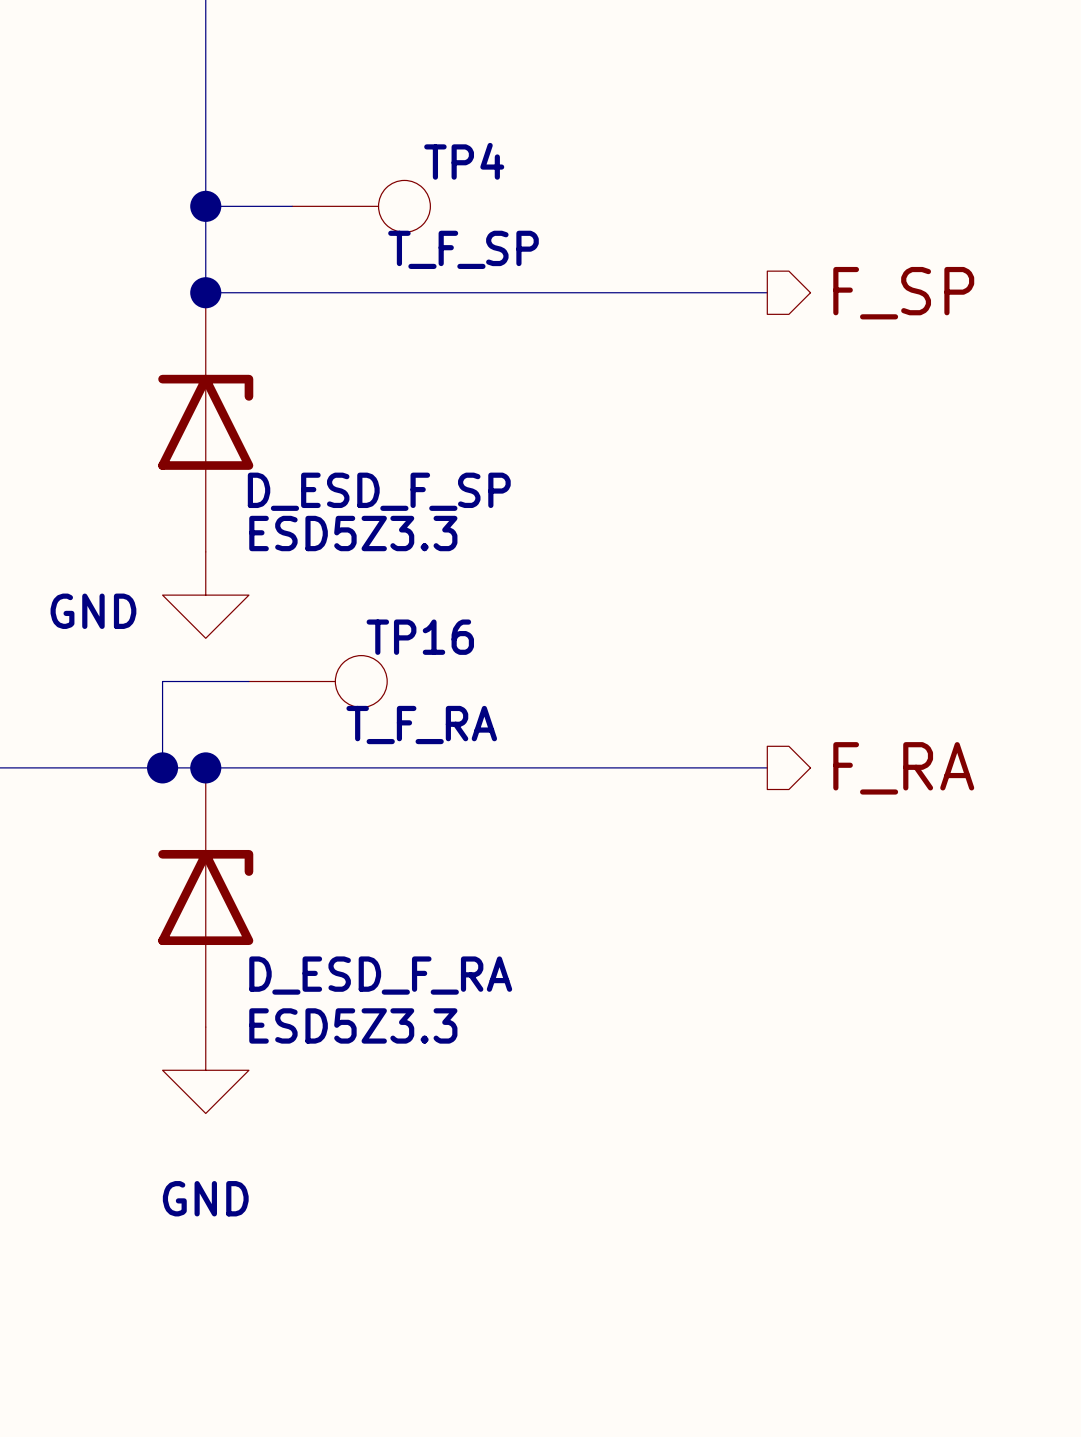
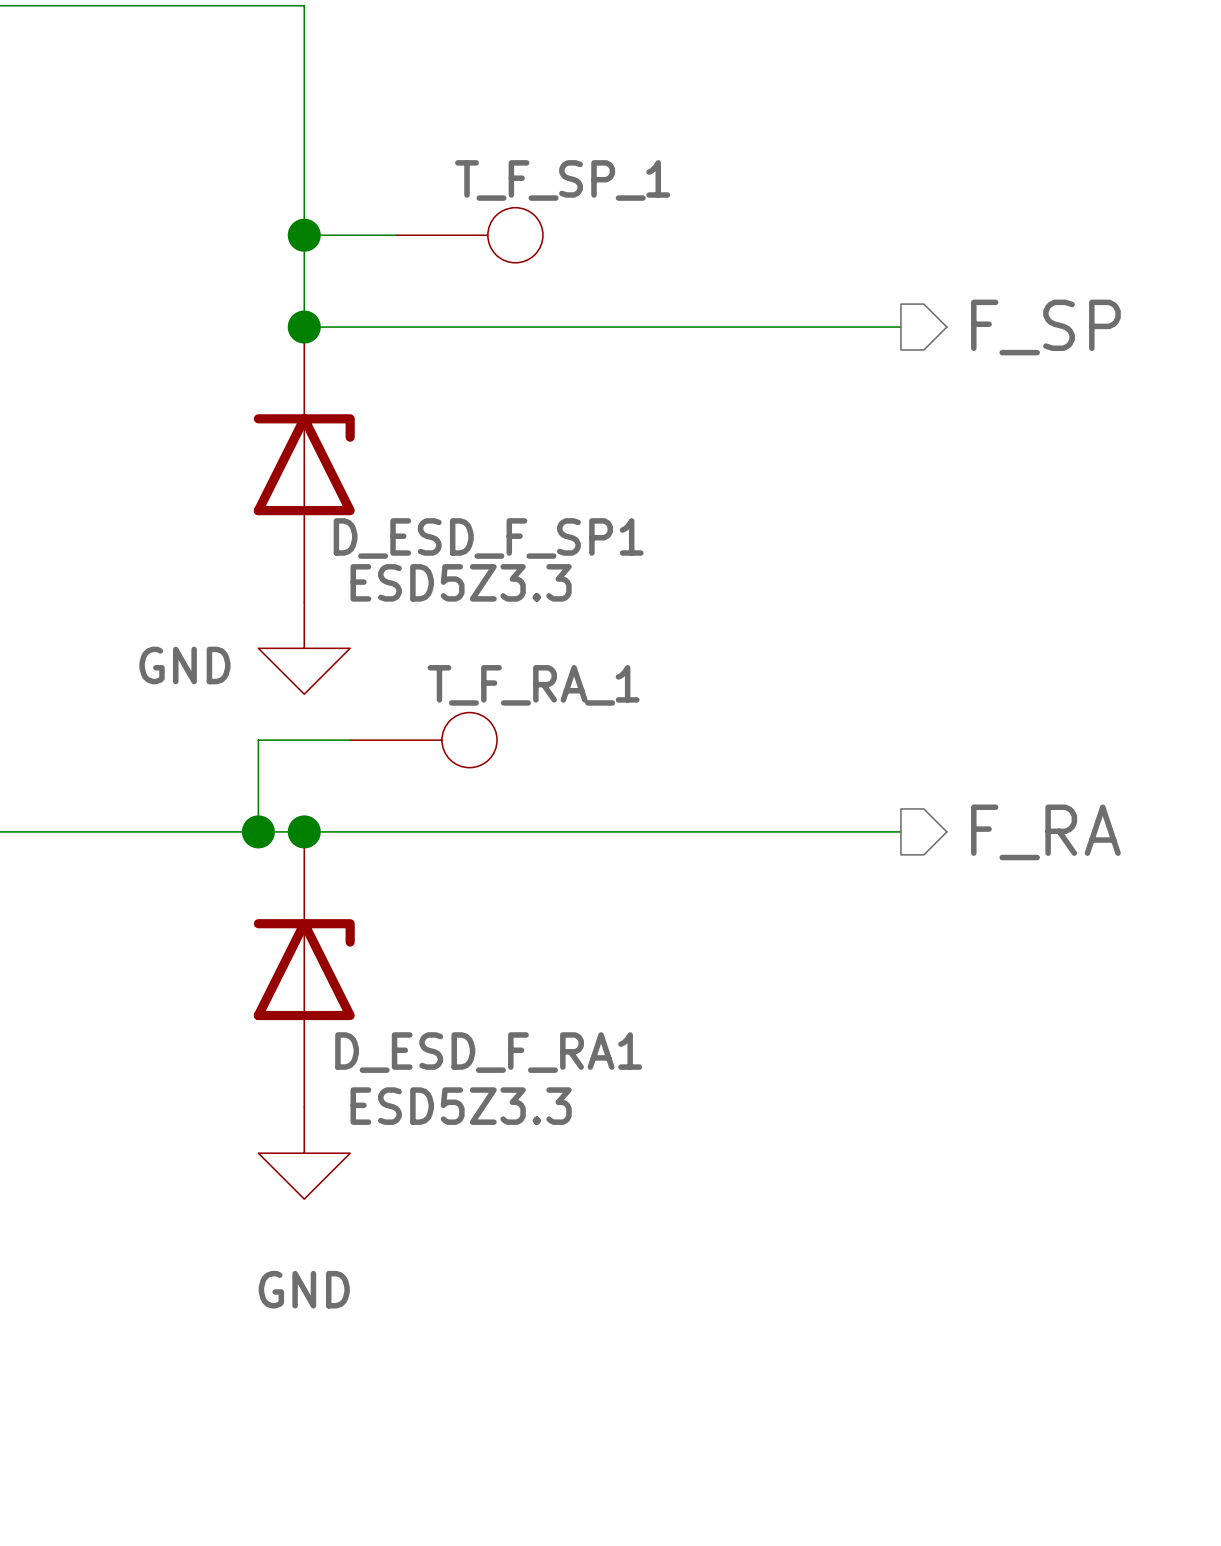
TP4 name: TP4 (464, 161) -> T_F_SP_1 (562, 180)
TP4 value: T_F_SP (463, 249) -> none
D_ESD_F_SP name: D_ESD_F_SP (379, 491) -> D_ESD_F_SP1 (488, 538)
TP16 name: TP16 (420, 637) -> T_F_RA_1 (533, 685)
TP16 value: T_F_RA (421, 725) -> none
D_ESD_F_RA name: D_ESD_F_RA (380, 975) -> D_ESD_F_RA1 (488, 1052)

